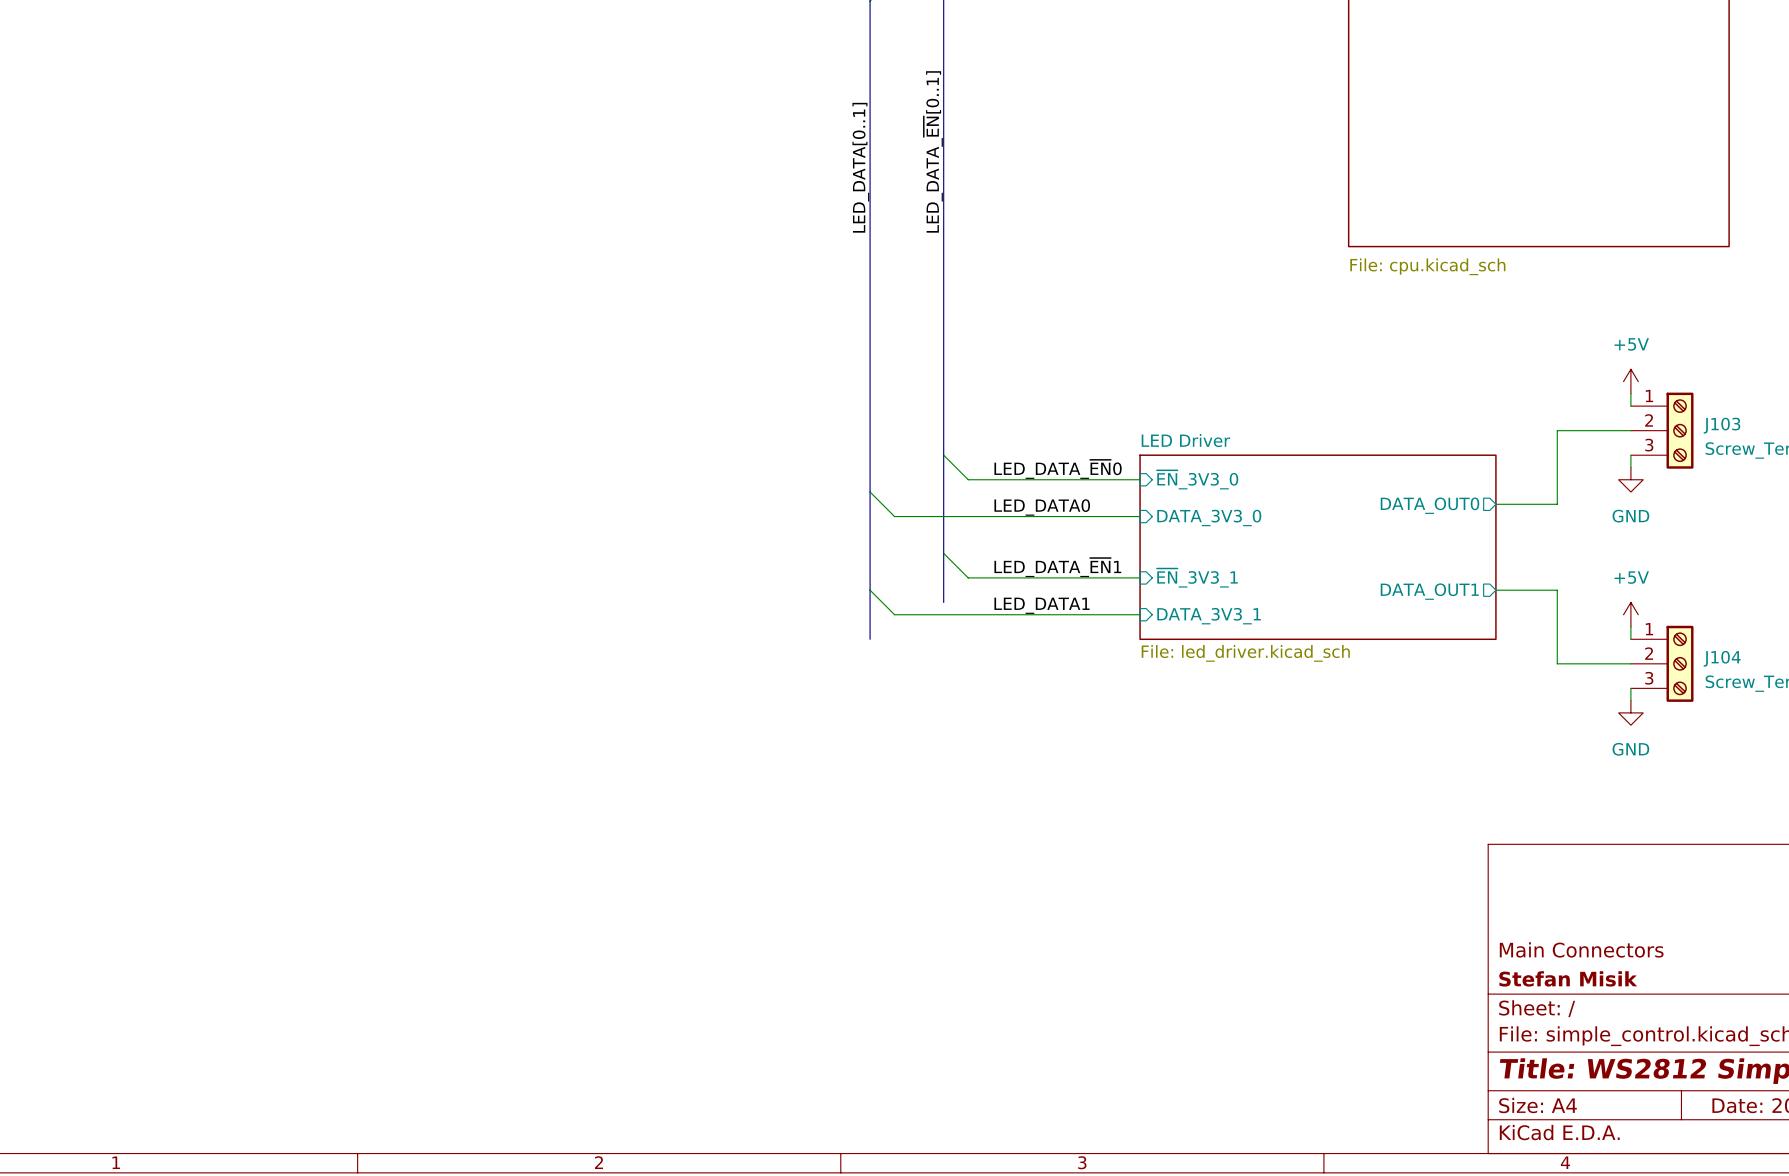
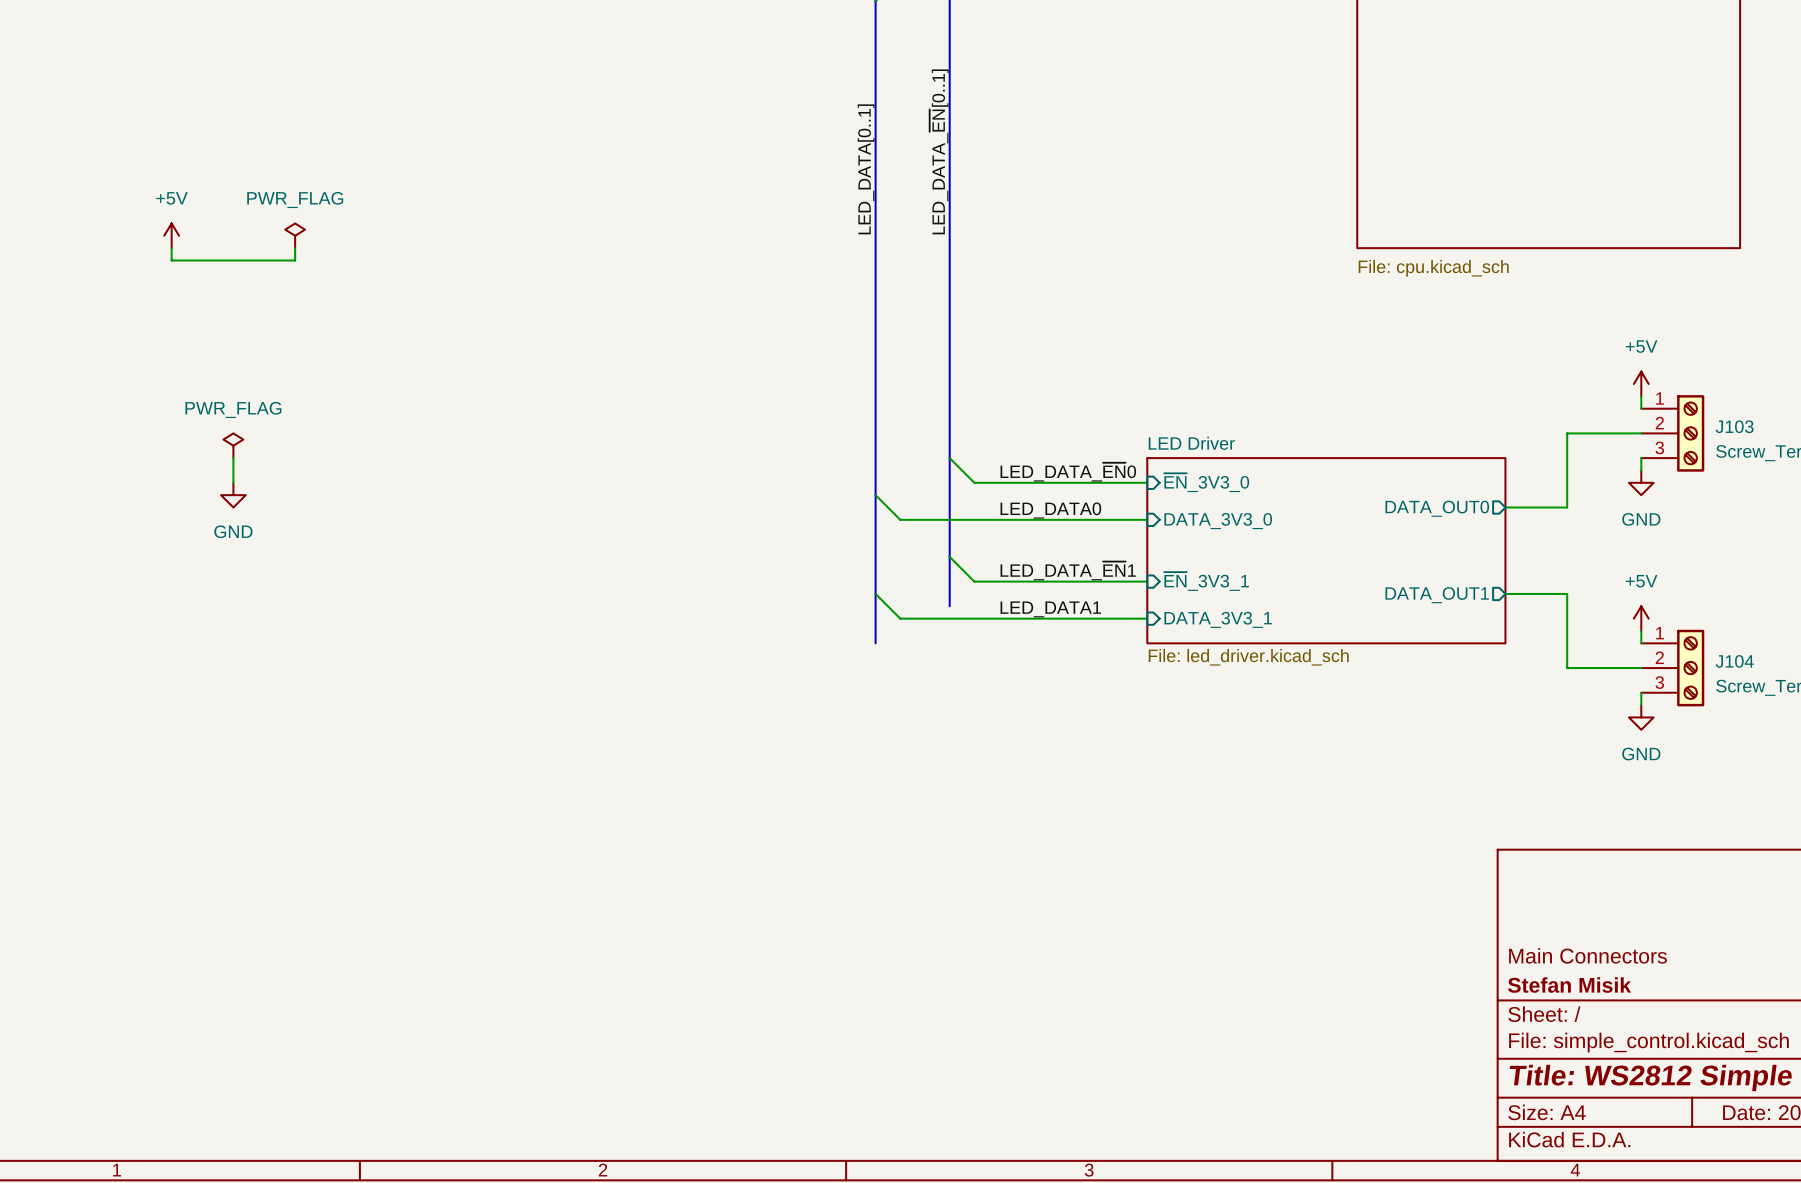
power symbol: none -> +5V (171, 235)
power symbol: none -> PWR_FLAG (295, 235)
wire: none -> (171, 248) (171, 260) (295, 260) (295, 248)
power symbol: none -> PWR_FLAG (233, 445)
wire: none -> (233, 458) (233, 482)
power symbol: none -> GND (233, 495)

